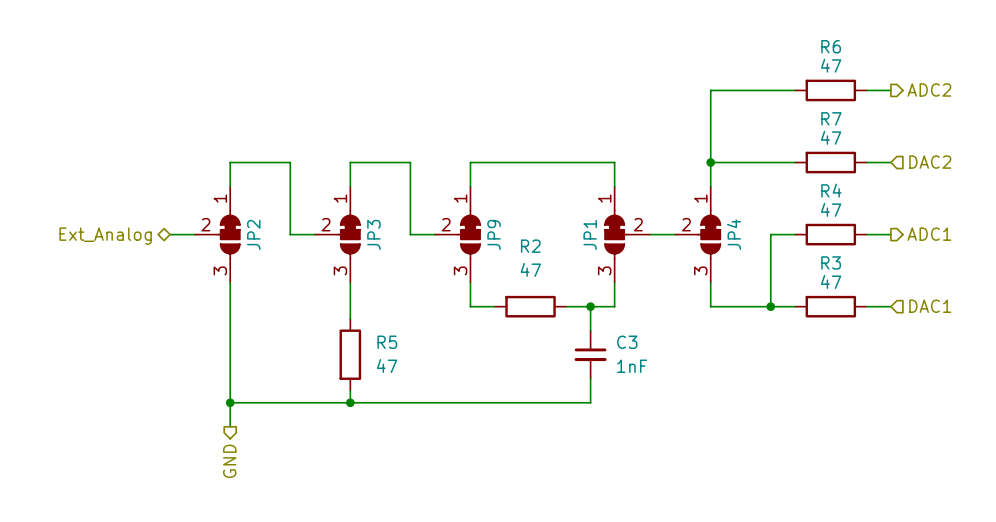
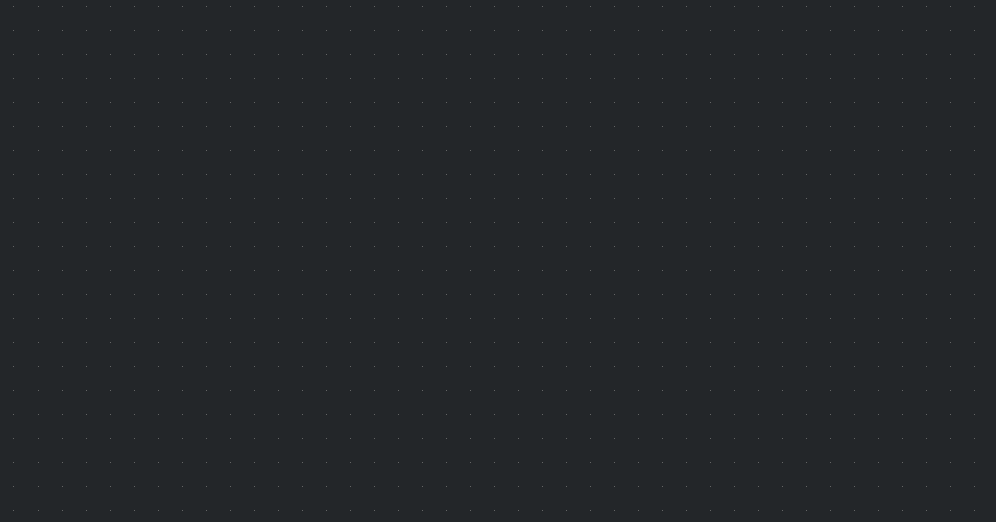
wire: (794, 90) (710, 90) (710, 186) -> none
R6: 47 (830, 90) -> none
wire: (866, 90) (890, 90) -> none
hierarchical label: ADC2 (929, 90) -> none
wire: (710, 162) (794, 162) -> none
junction: (710, 162) -> none
R7: 47 (830, 162) -> none
wire: (866, 162) (890, 162) -> none
hierarchical label: DAC2 (930, 162) -> none
wire: (230, 186) (230, 162) (290, 162) (290, 234) (314, 234) -> none
wire: (350, 186) (350, 162) (410, 162) (410, 234) (434, 234) -> none
wire: (470, 186) (470, 162) (614, 162) (614, 186) -> none
wire: (170, 234) (194, 234) -> none
JP2: (217, 234) -> none
JP3: (337, 234) -> none
JP9: (457, 234) -> none
JP1: (627, 234) -> none
wire: (650, 234) (674, 234) -> none
JP4: (697, 234) -> none
wire: (794, 234) (770, 234) (770, 306) -> none
R4: 47 (830, 234) -> none
wire: (866, 234) (890, 234) -> none
hierarchical label: ADC1 (929, 234) -> none
hierarchical label: Ext_Analog (105, 236) -> none
wire: (230, 282) (230, 426) -> none
wire: (350, 282) (350, 318) -> none
wire: (470, 282) (470, 306) (494, 306) -> none
wire: (614, 282) (614, 306) (566, 306) -> none
wire: (710, 282) (710, 306) (794, 306) -> none
R2: 47 (530, 306) -> none
wire: (590, 306) (590, 330) -> none
junction: (590, 306) -> none
junction: (770, 306) -> none
R3: 47 (830, 306) -> none
wire: (866, 306) (890, 306) -> none
hierarchical label: DAC1 (930, 306) -> none
R5: 47 (350, 354) -> none
C3: 1nF (590, 354) -> none
wire: (590, 378) (590, 402) (230, 402) -> none
wire: (350, 390) (350, 402) -> none
junction: (230, 402) -> none
junction: (350, 402) -> none
hierarchical label: GND (229, 461) -> none

